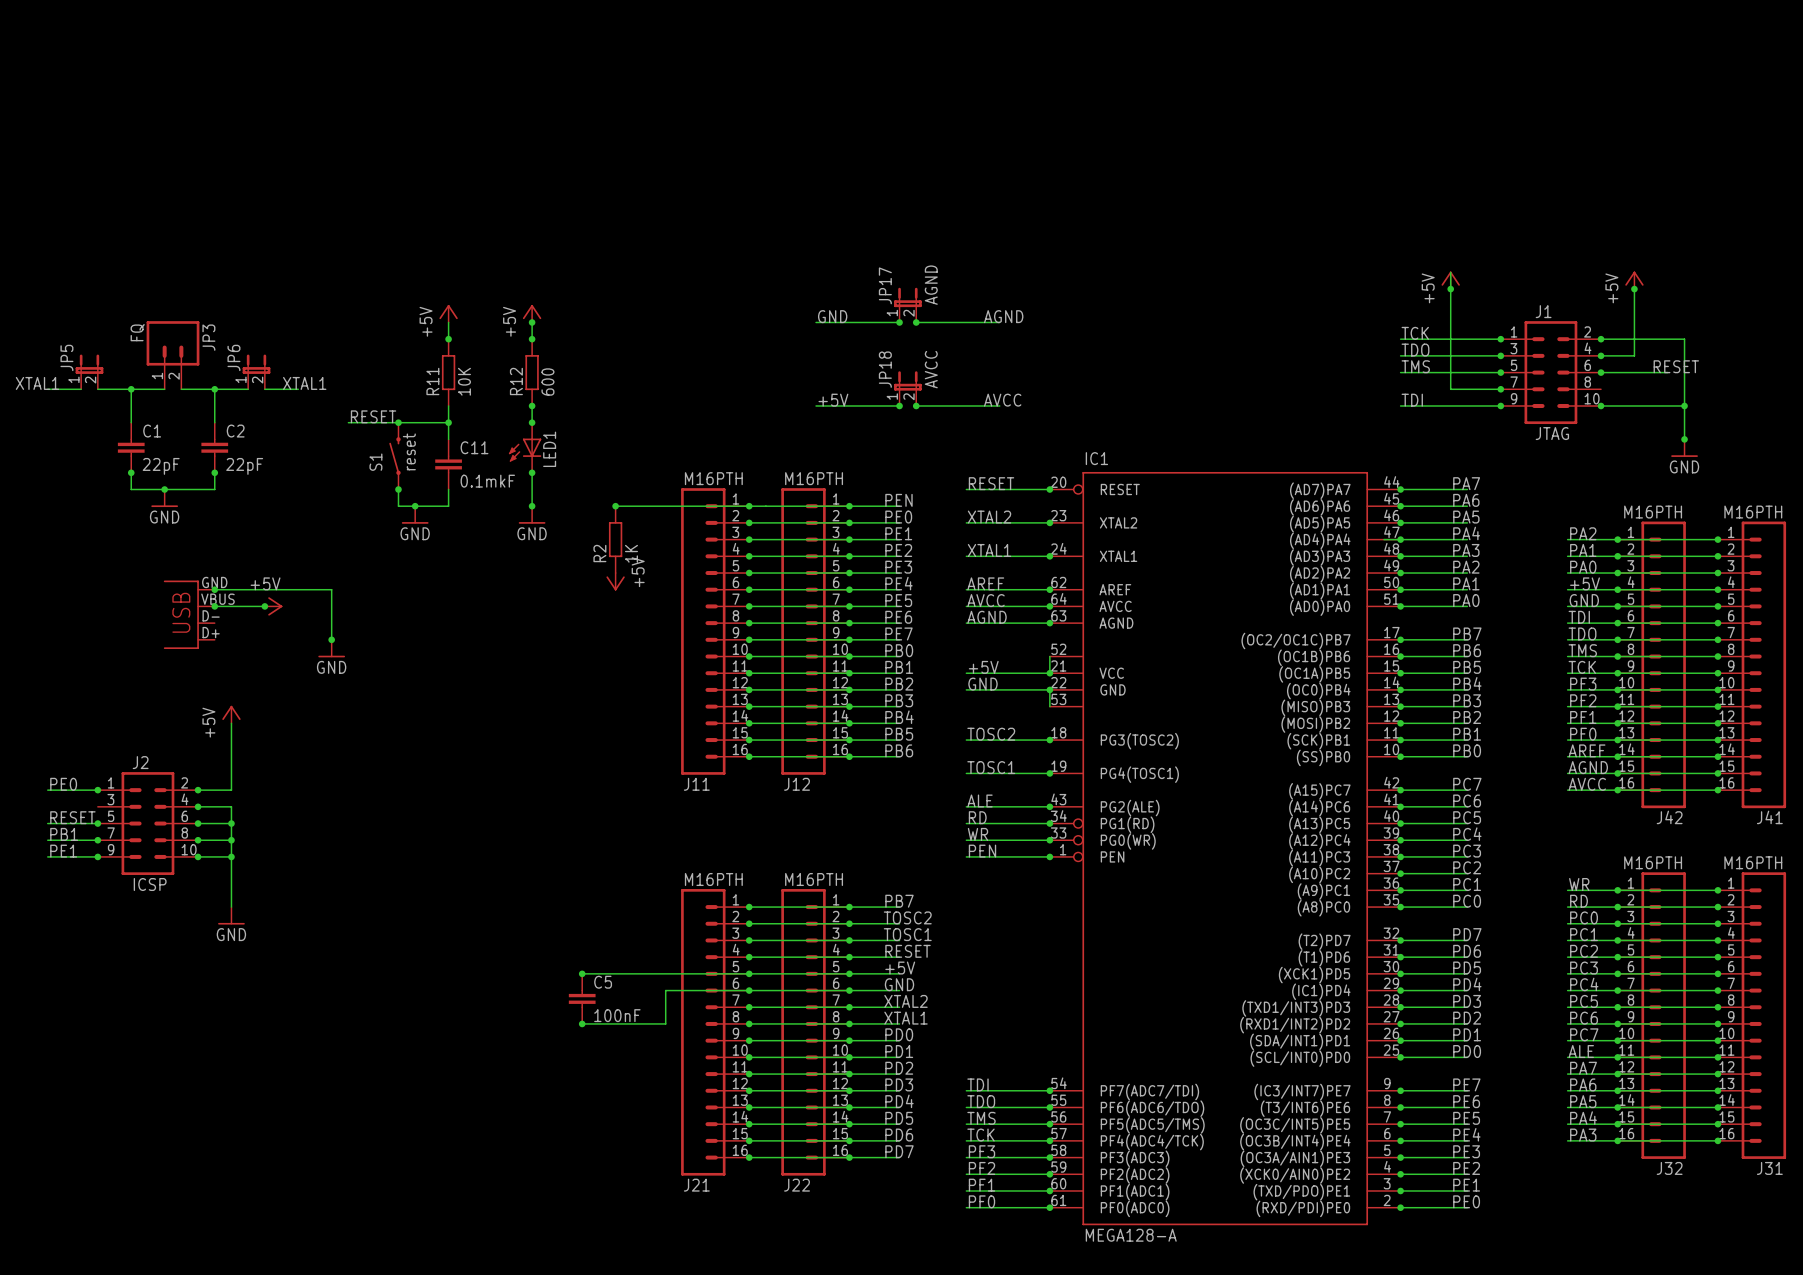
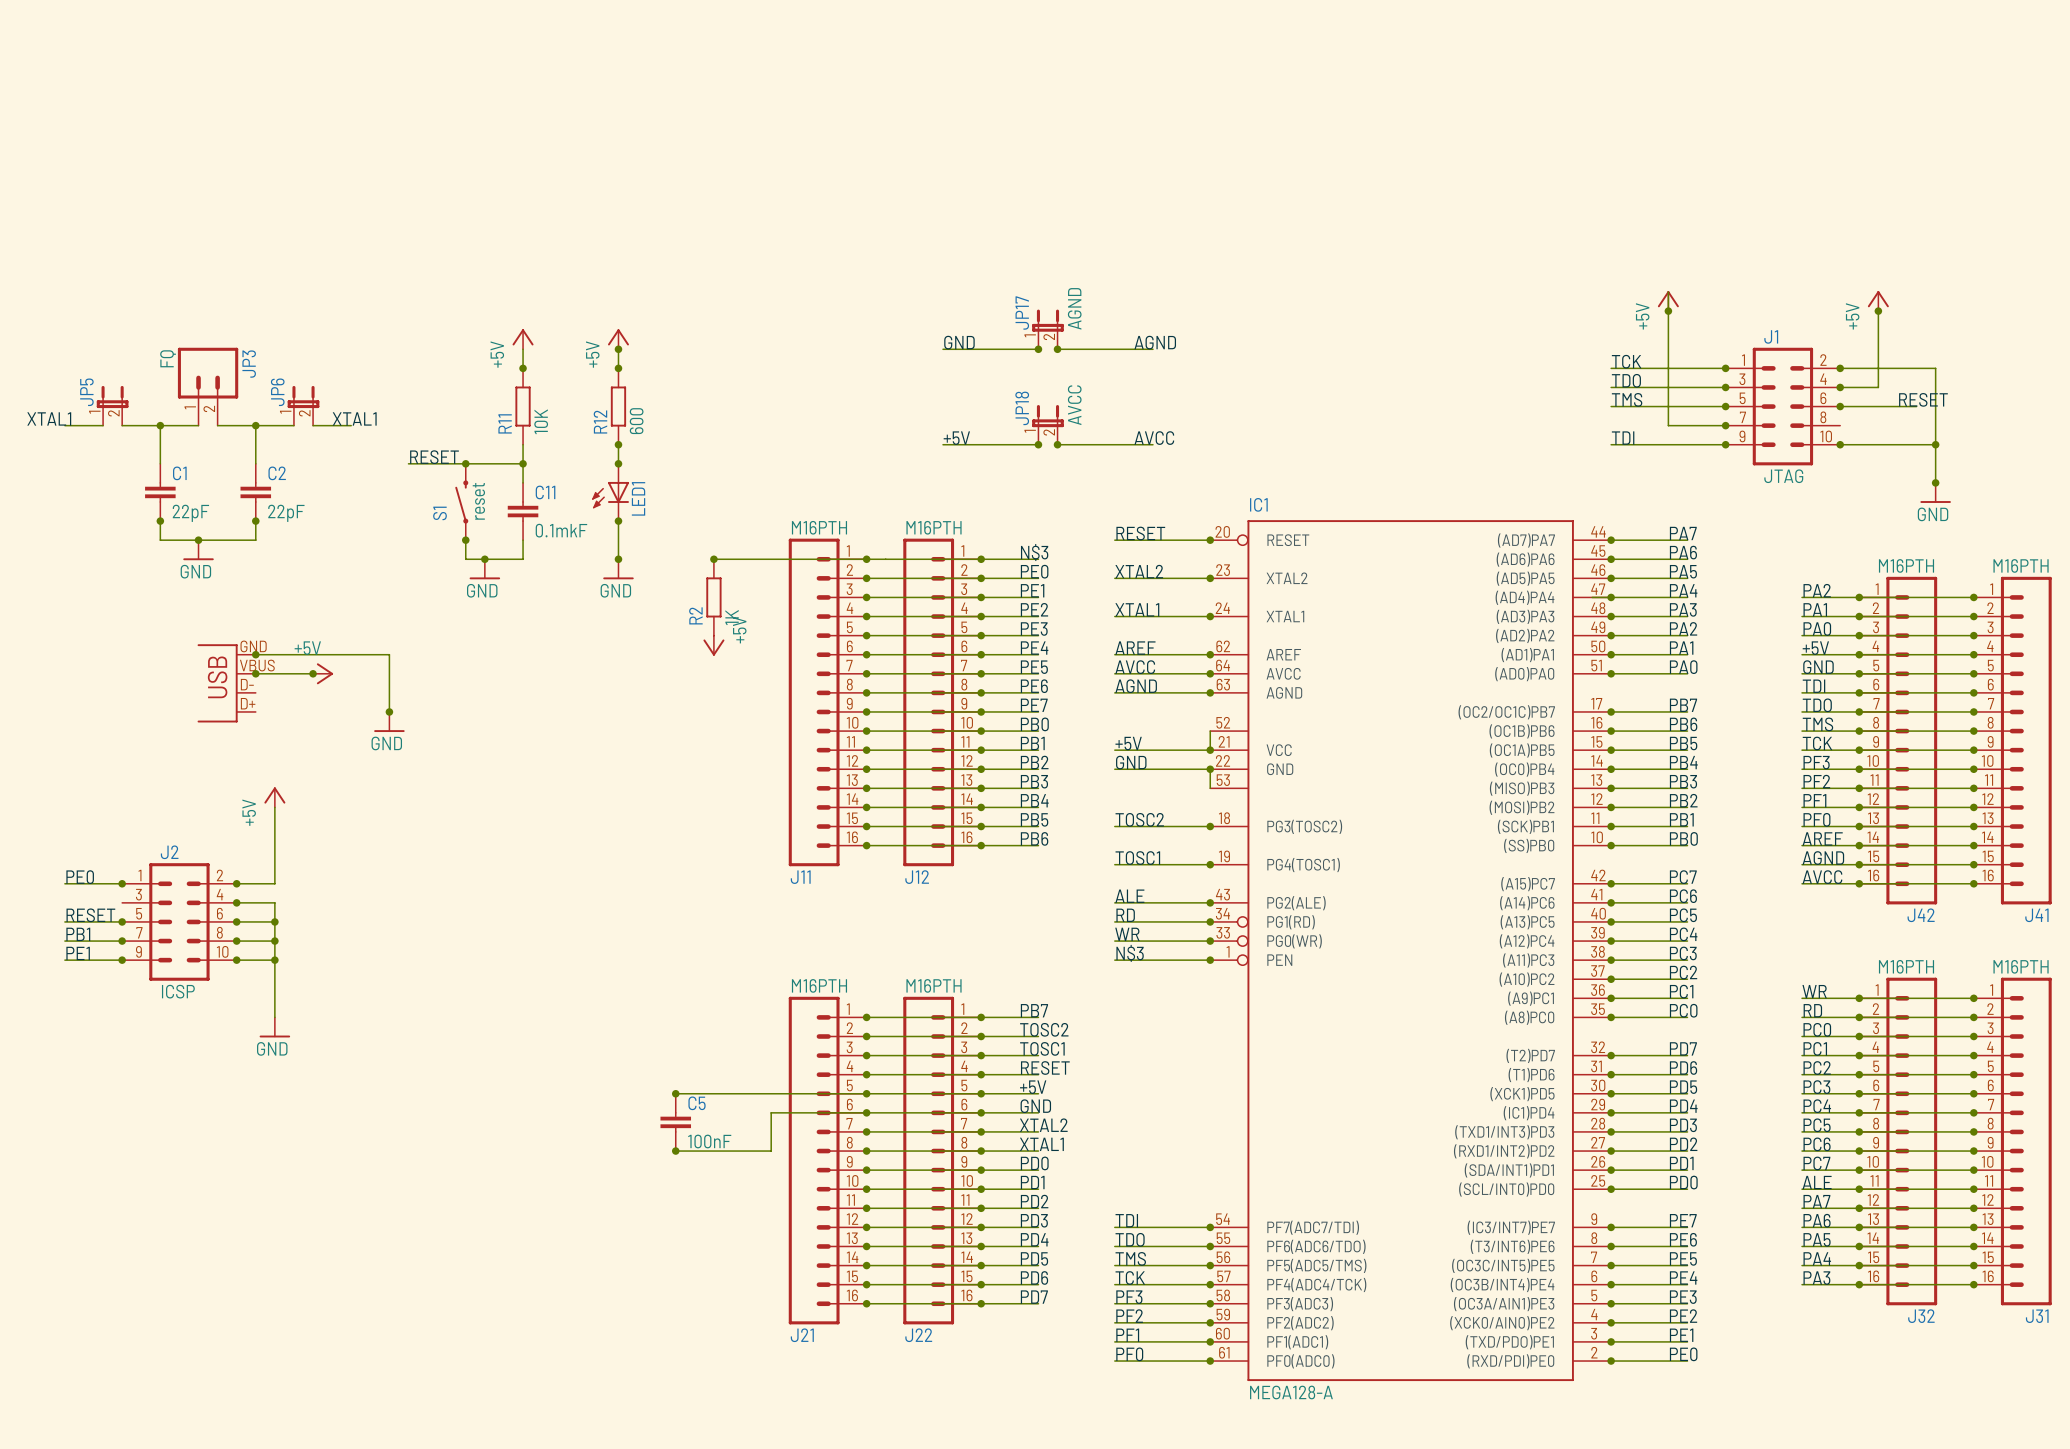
label: PEN (898, 500) -> N$3 (1034, 552)
label: PEN (982, 851) -> N$3 (1130, 953)

